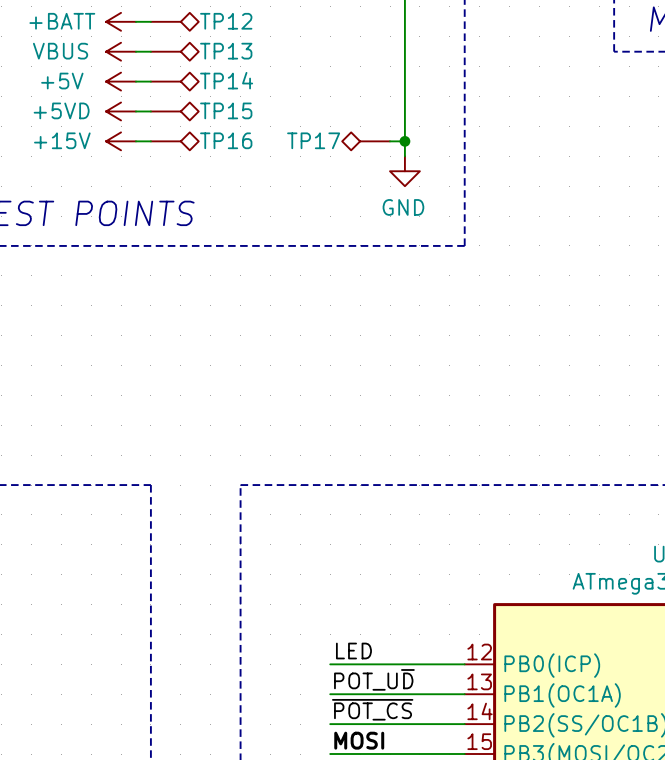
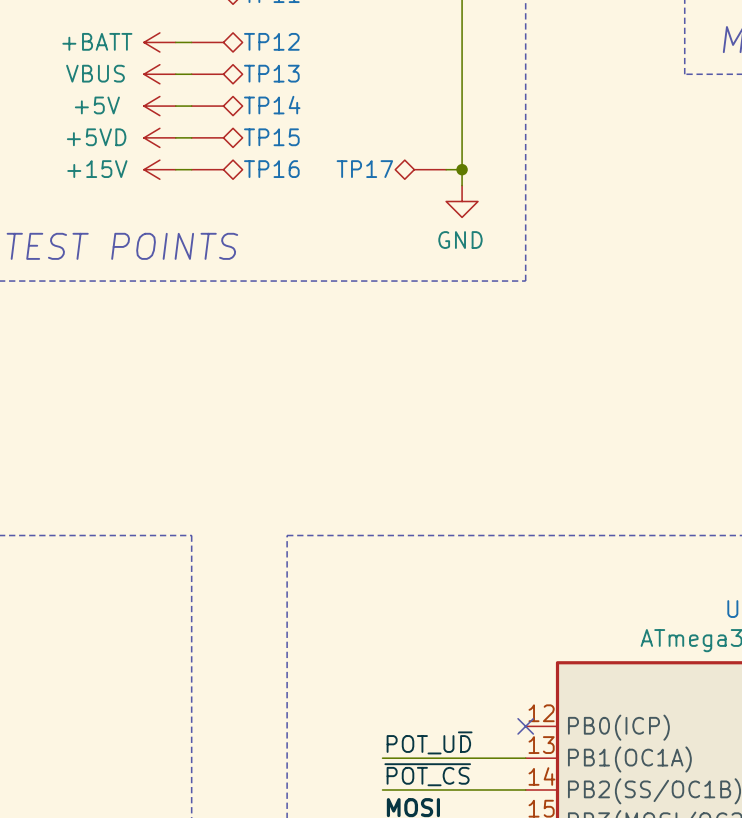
label: LED (353, 651) -> none
wire: (330, 664) (464, 664) -> none
no-connect mark: none -> (525, 726)

